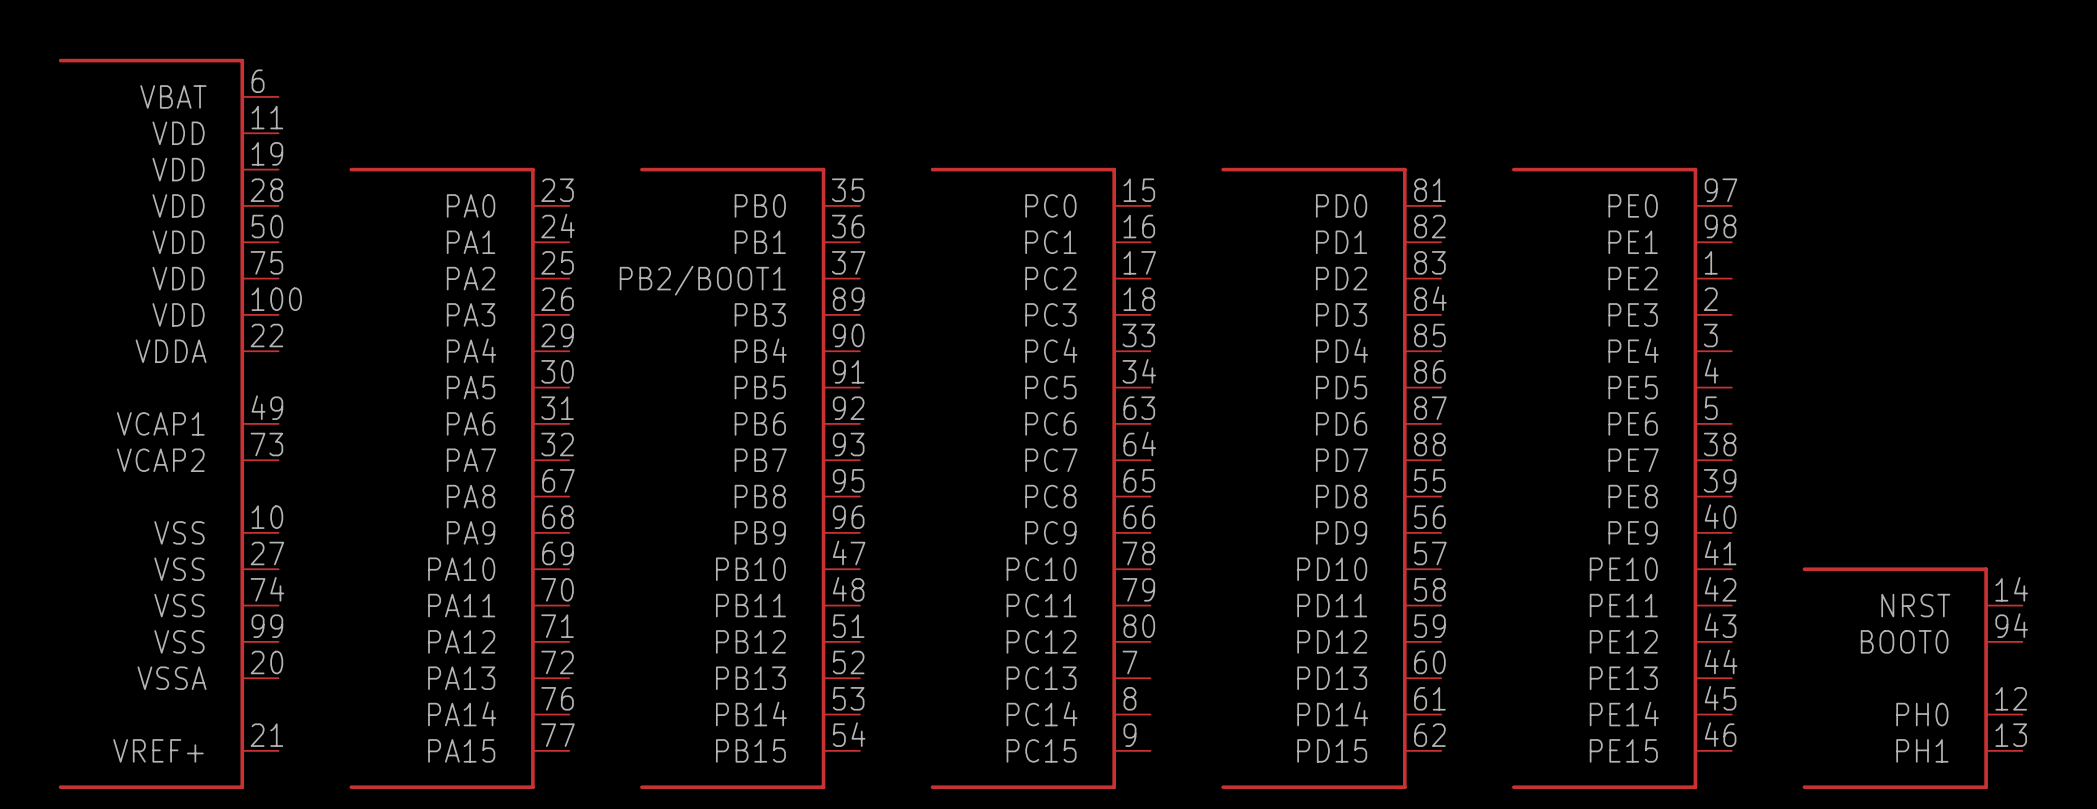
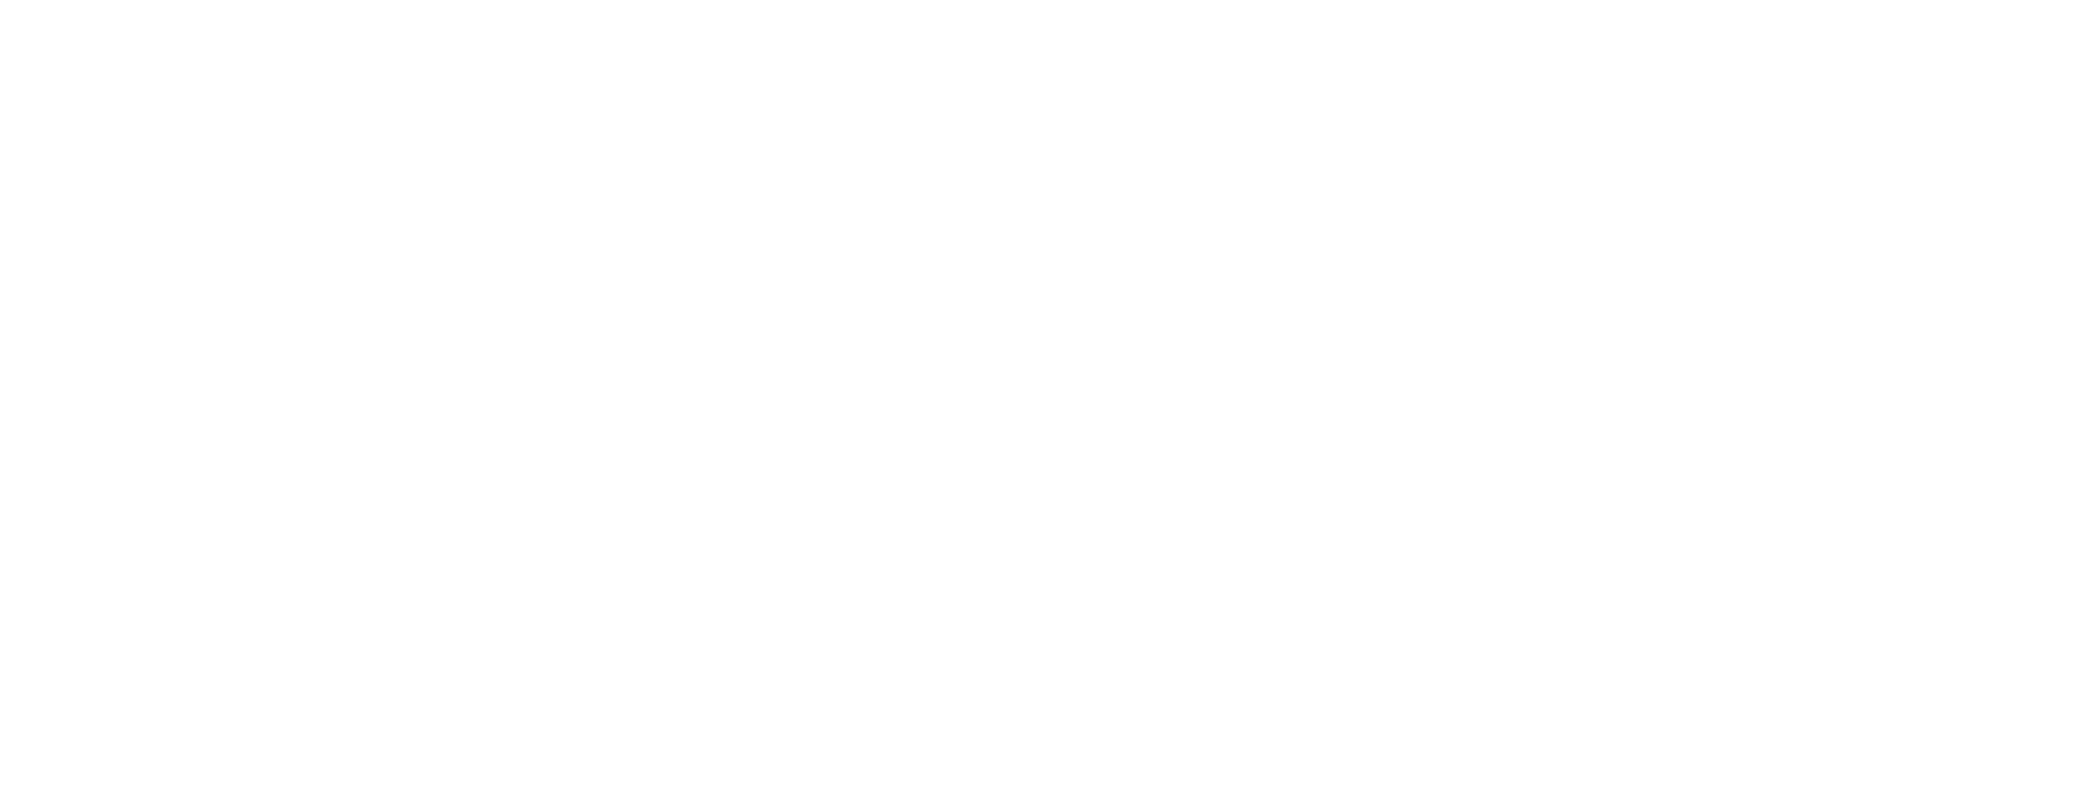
part: (168, 423) -> none
part: (459, 478) -> none
part: (749, 478) -> none
part: (1040, 478) -> none
part: (1331, 478) -> none
part: (1621, 478) -> none
part: (1912, 678) -> none

